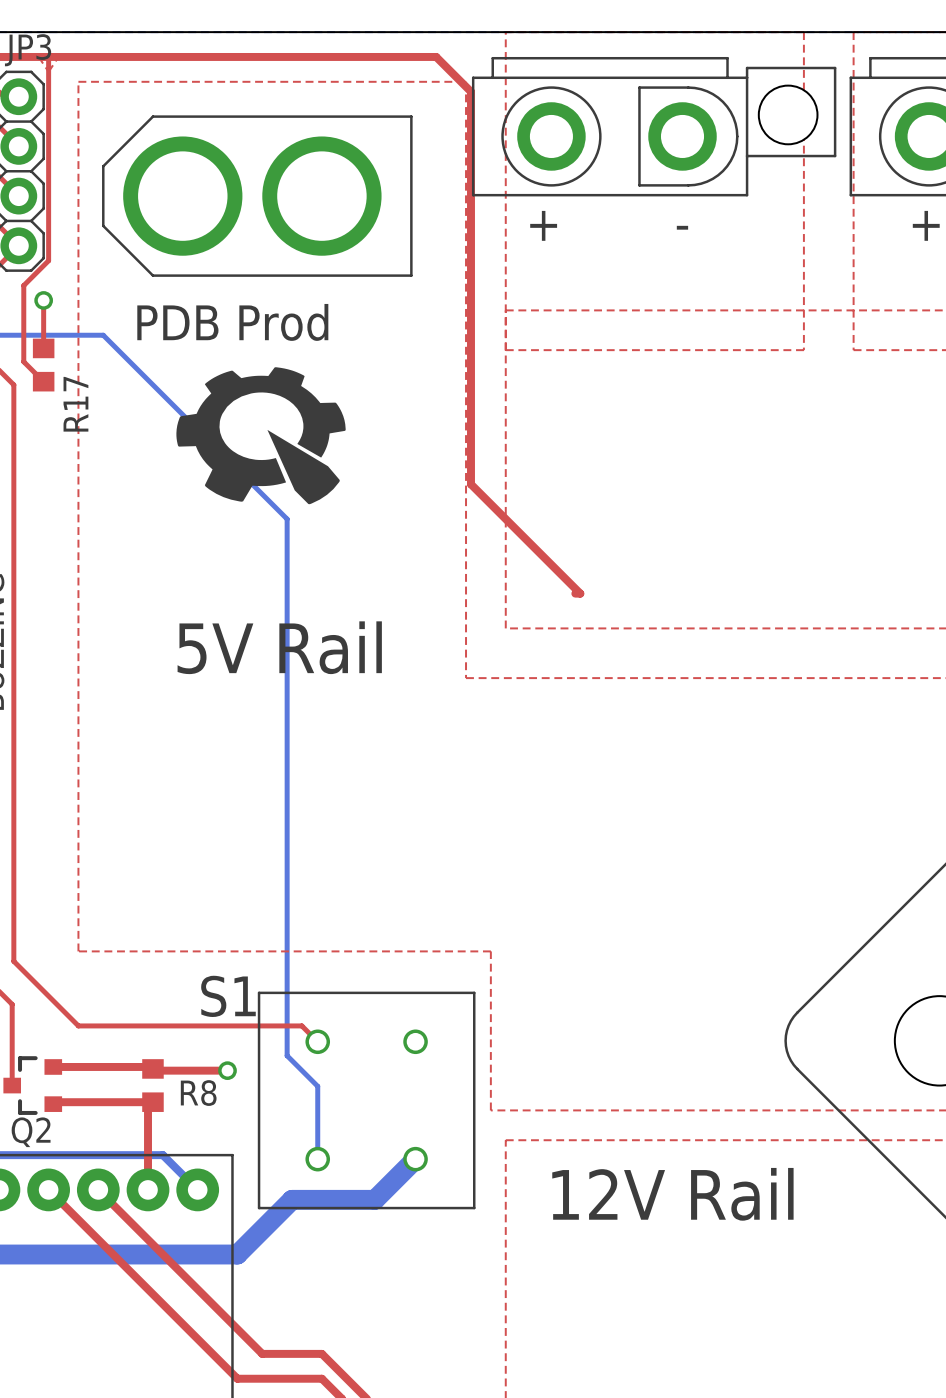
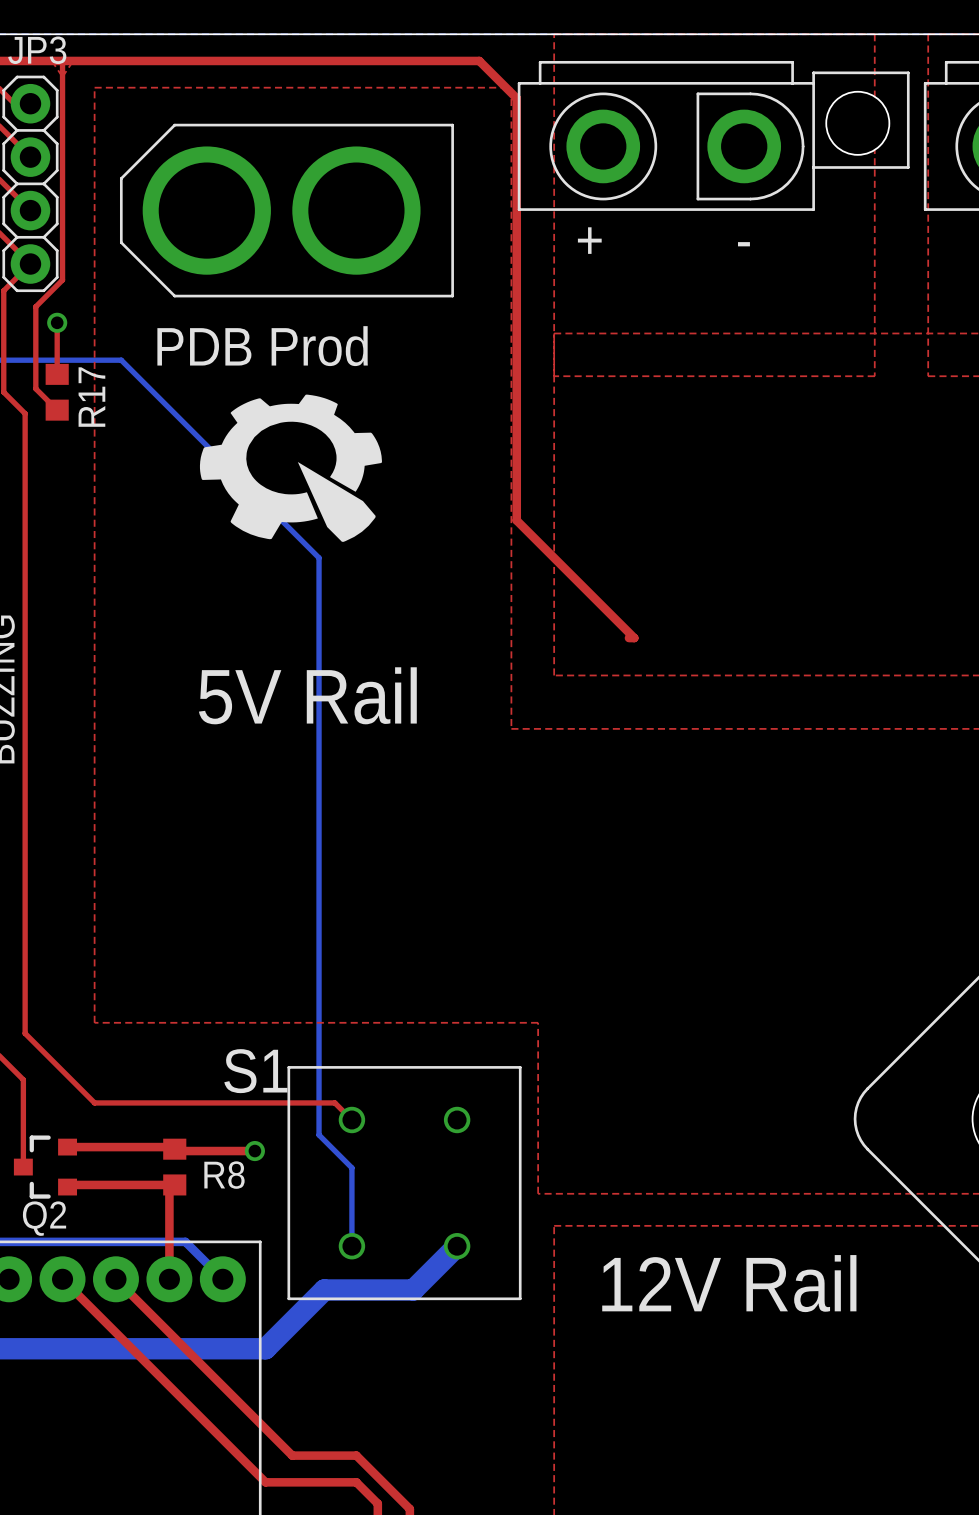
R17 name position: R17 (75, 404) -> R17 (91, 397)

